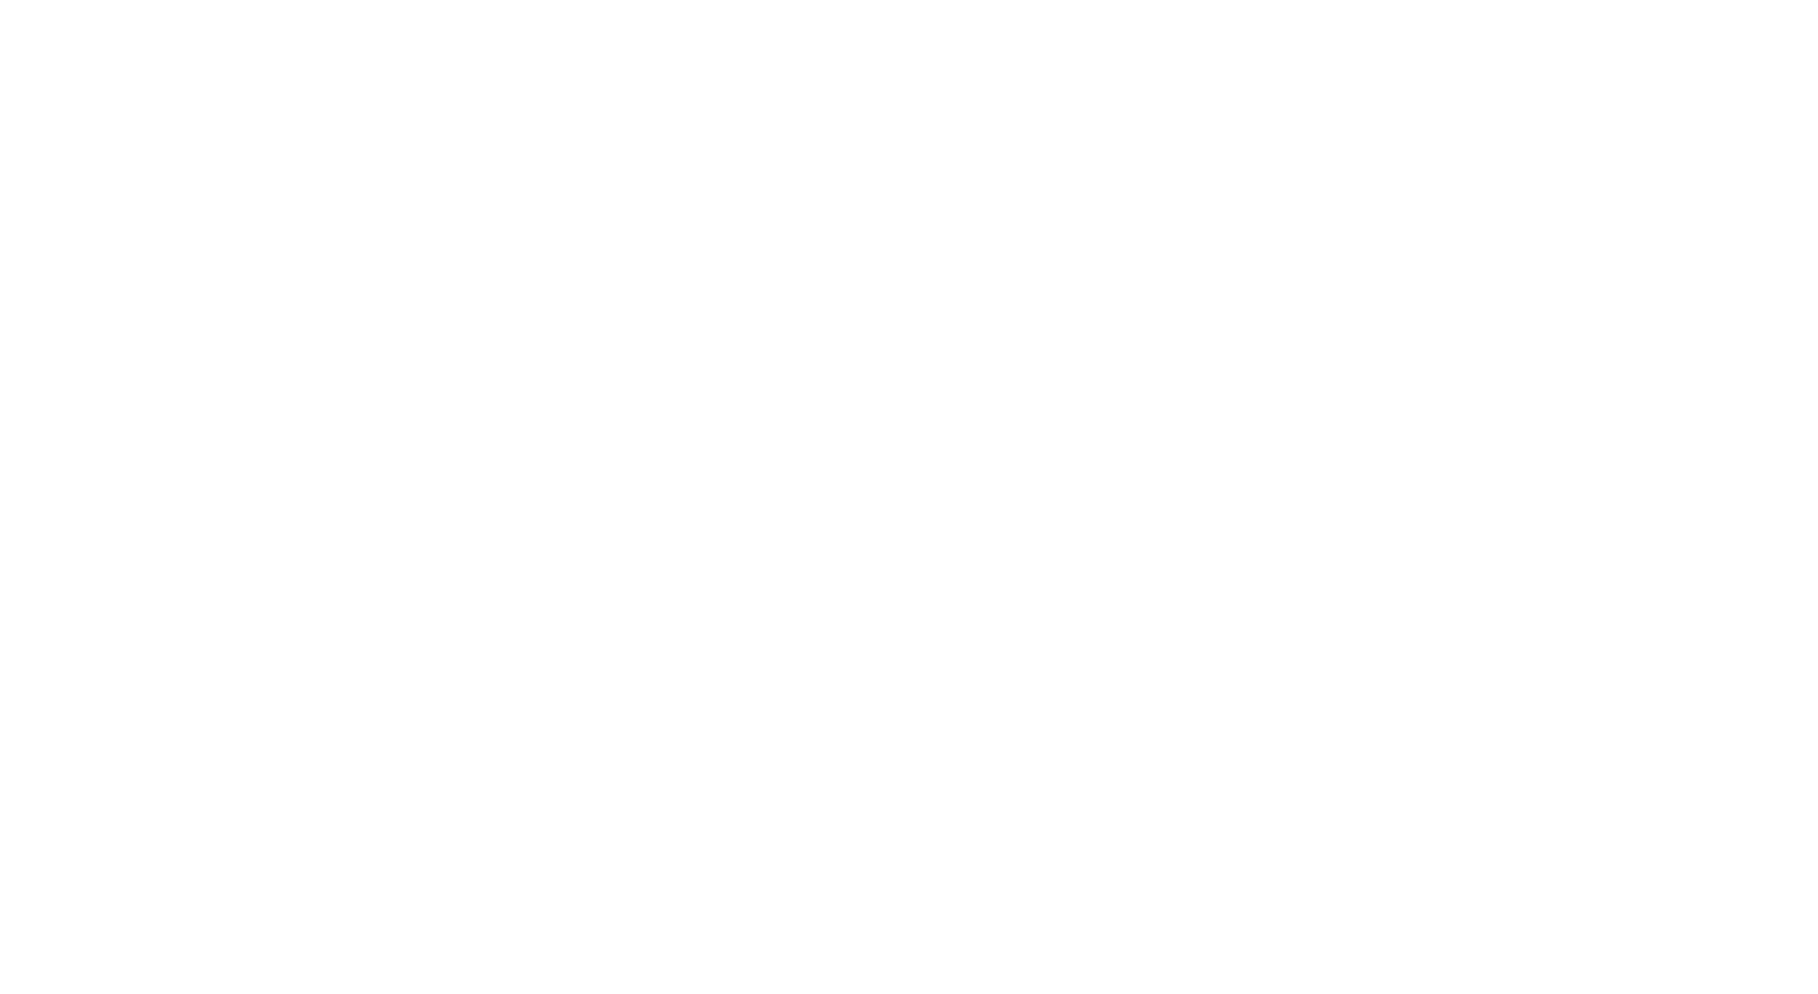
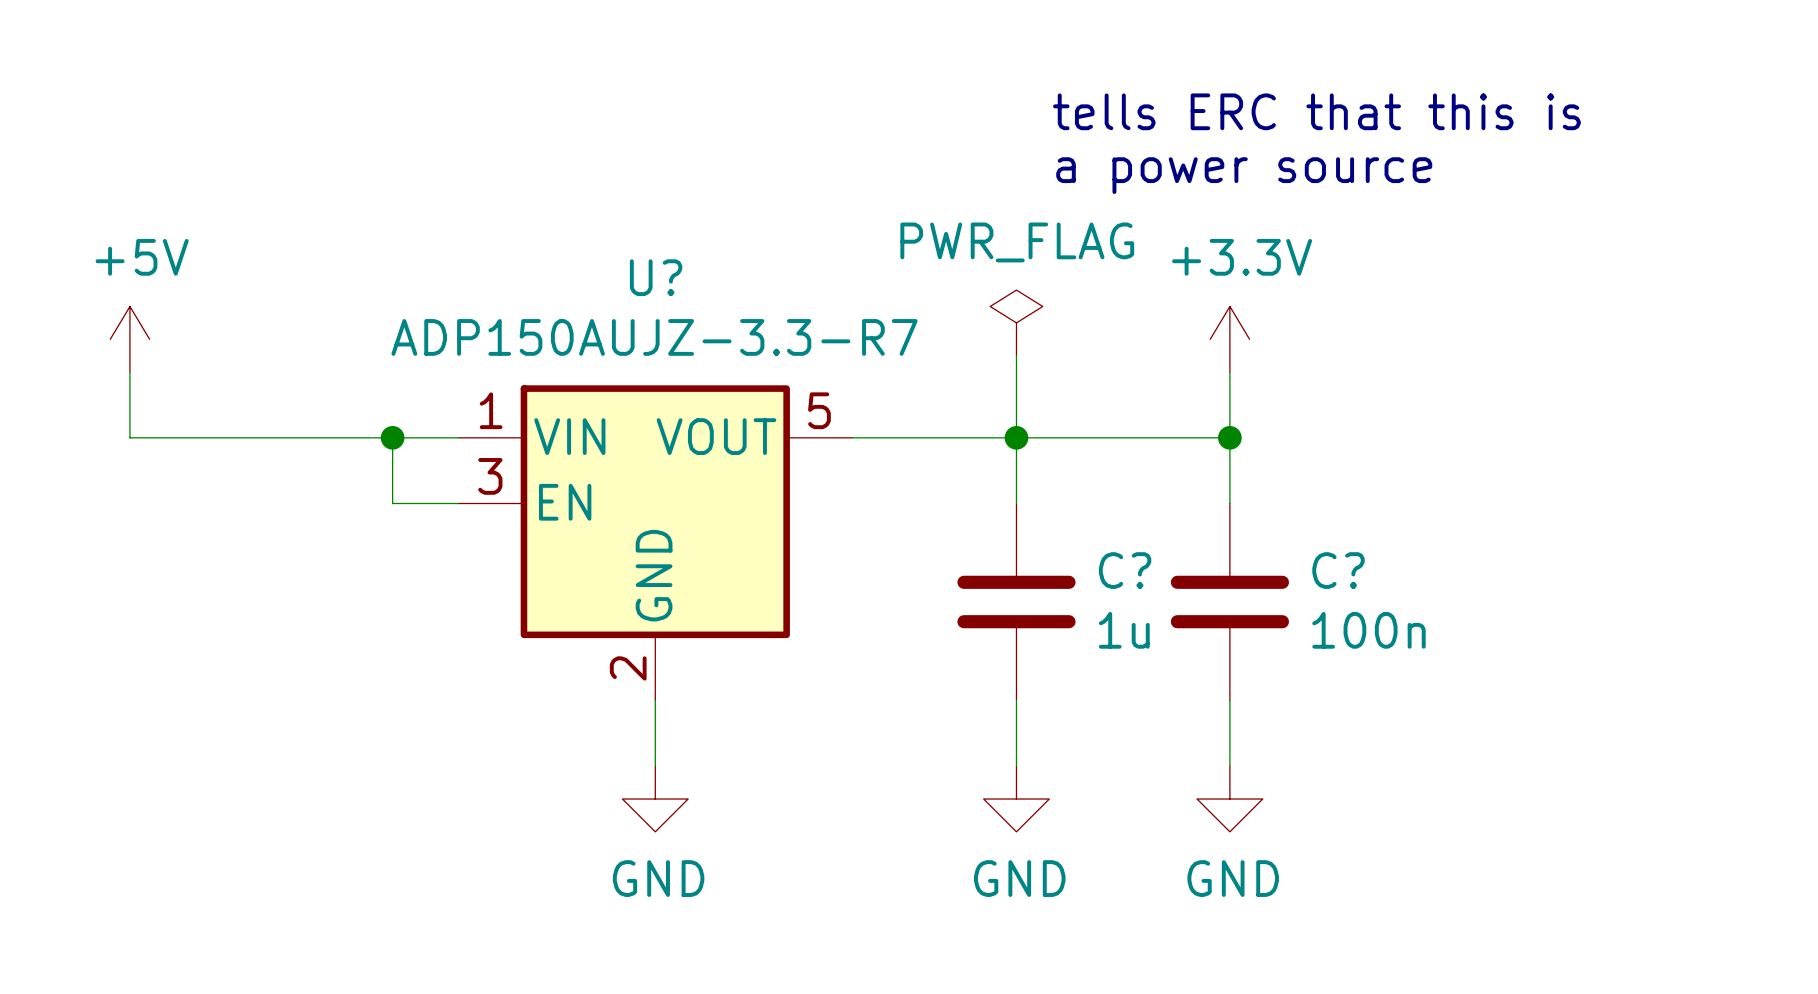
text: none -> tells ERC that this is (1316, 111)
text: none -> a power source (1244, 175)
power symbol: none -> PWR_FLAG (1016, 322)
power symbol: none -> +5V (129, 339)
power symbol: none -> +3.3V (1229, 339)
wire: none -> (1016, 355) (1016, 503)
wire: none -> (129, 372) (129, 437) (458, 437)
wire: none -> (1229, 372) (1229, 503)
wire: none -> (392, 437) (392, 503) (458, 503)
junction: none -> (392, 437)
wire: none -> (852, 437) (1229, 437)
junction: none -> (1016, 437)
junction: none -> (1229, 437)
U?: none -> ADP150AUJZ-3.3-R7 (655, 542)
C?: none -> 1u (1016, 602)
C?: none -> 100n (1229, 602)
wire: none -> (655, 700) (655, 766)
wire: none -> (1016, 700) (1016, 766)
wire: none -> (1229, 700) (1229, 766)
power symbol: none -> GND (655, 799)
power symbol: none -> GND (1016, 799)
power symbol: none -> GND (1229, 799)

